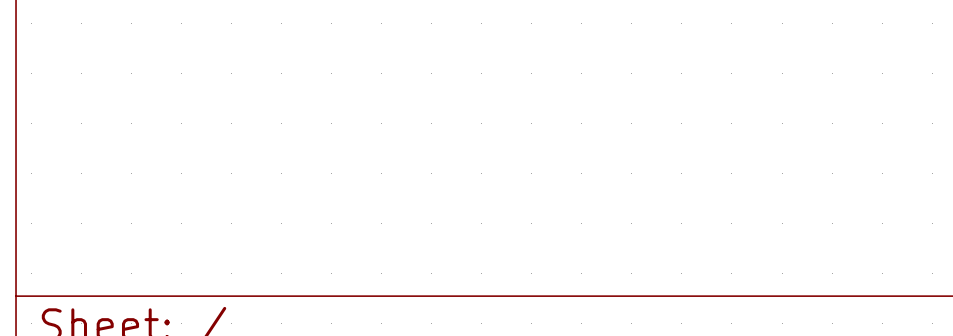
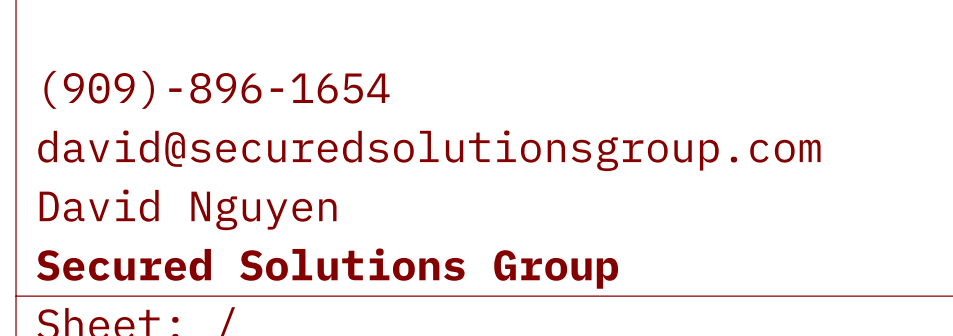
title block: none -> (909)-896-1654 (216, 89)
title block: none -> david@securedsolutionsgroup.com (429, 150)
title block: none -> David Nguyen (188, 209)
title block: none -> Secured Solutions Group (327, 268)

